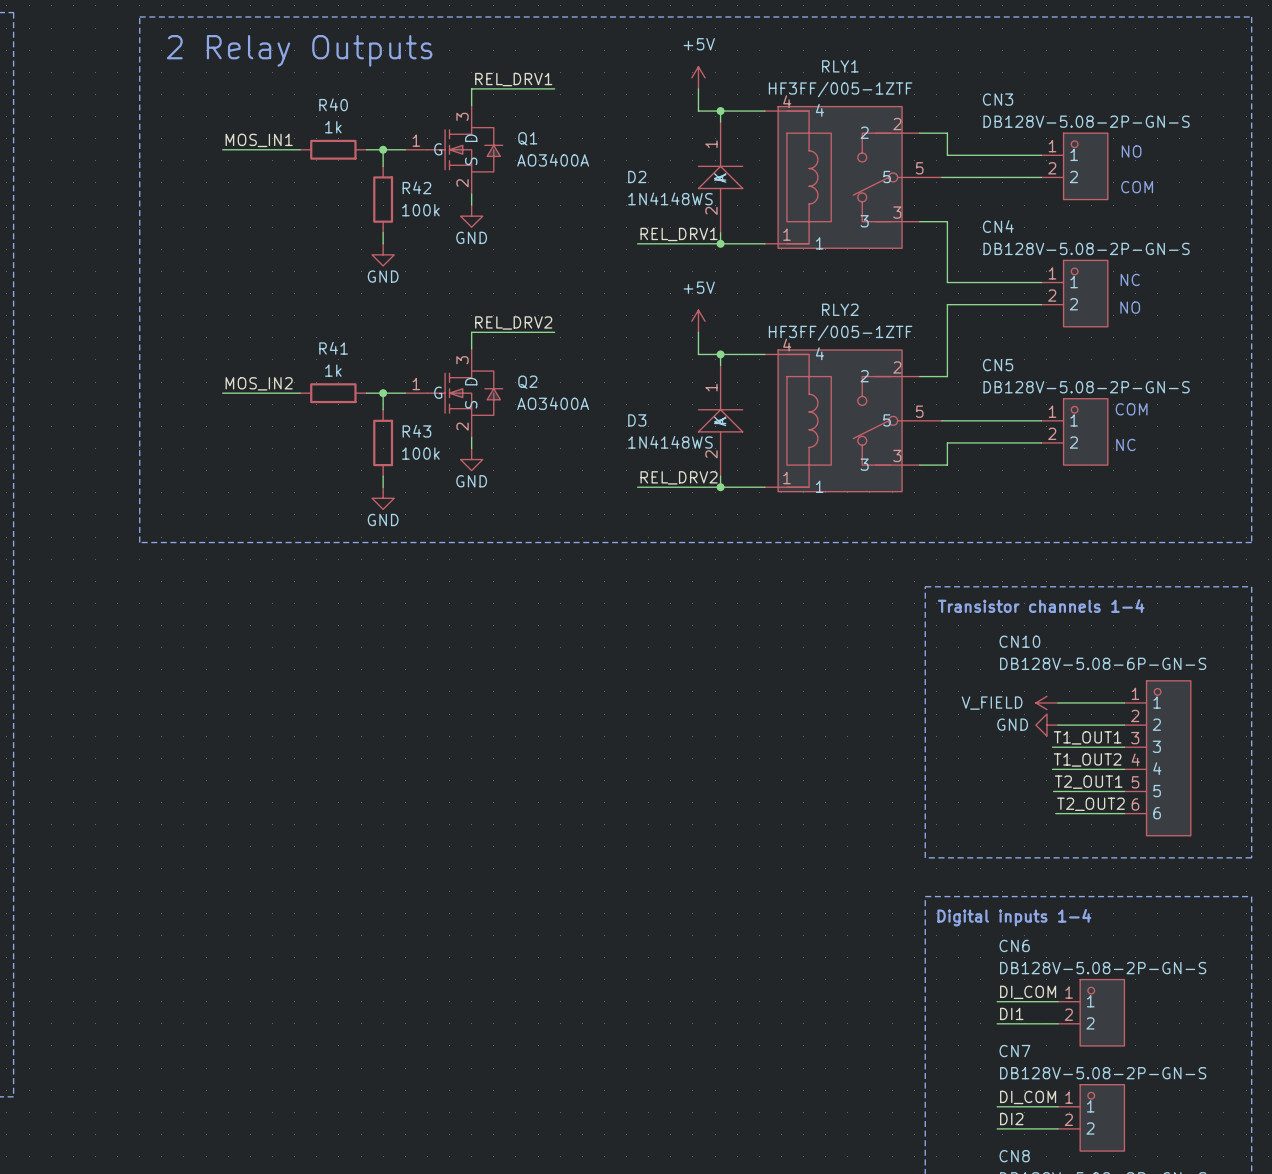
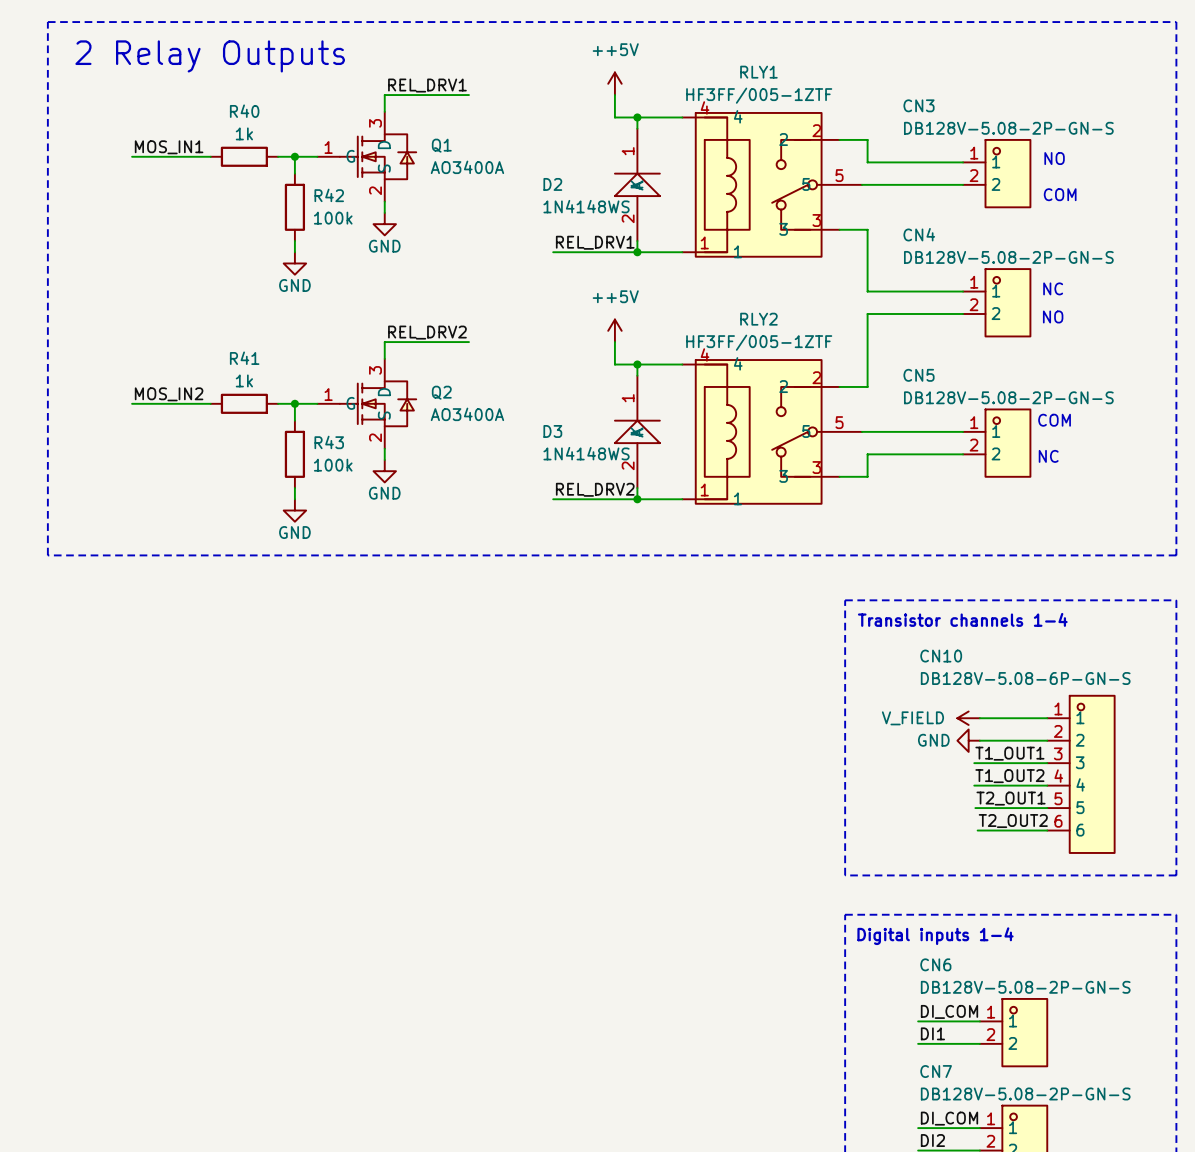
power symbol: +5V (698, 77) -> ++5V (614, 83)
power symbol: +5V (698, 321) -> ++5V (614, 330)

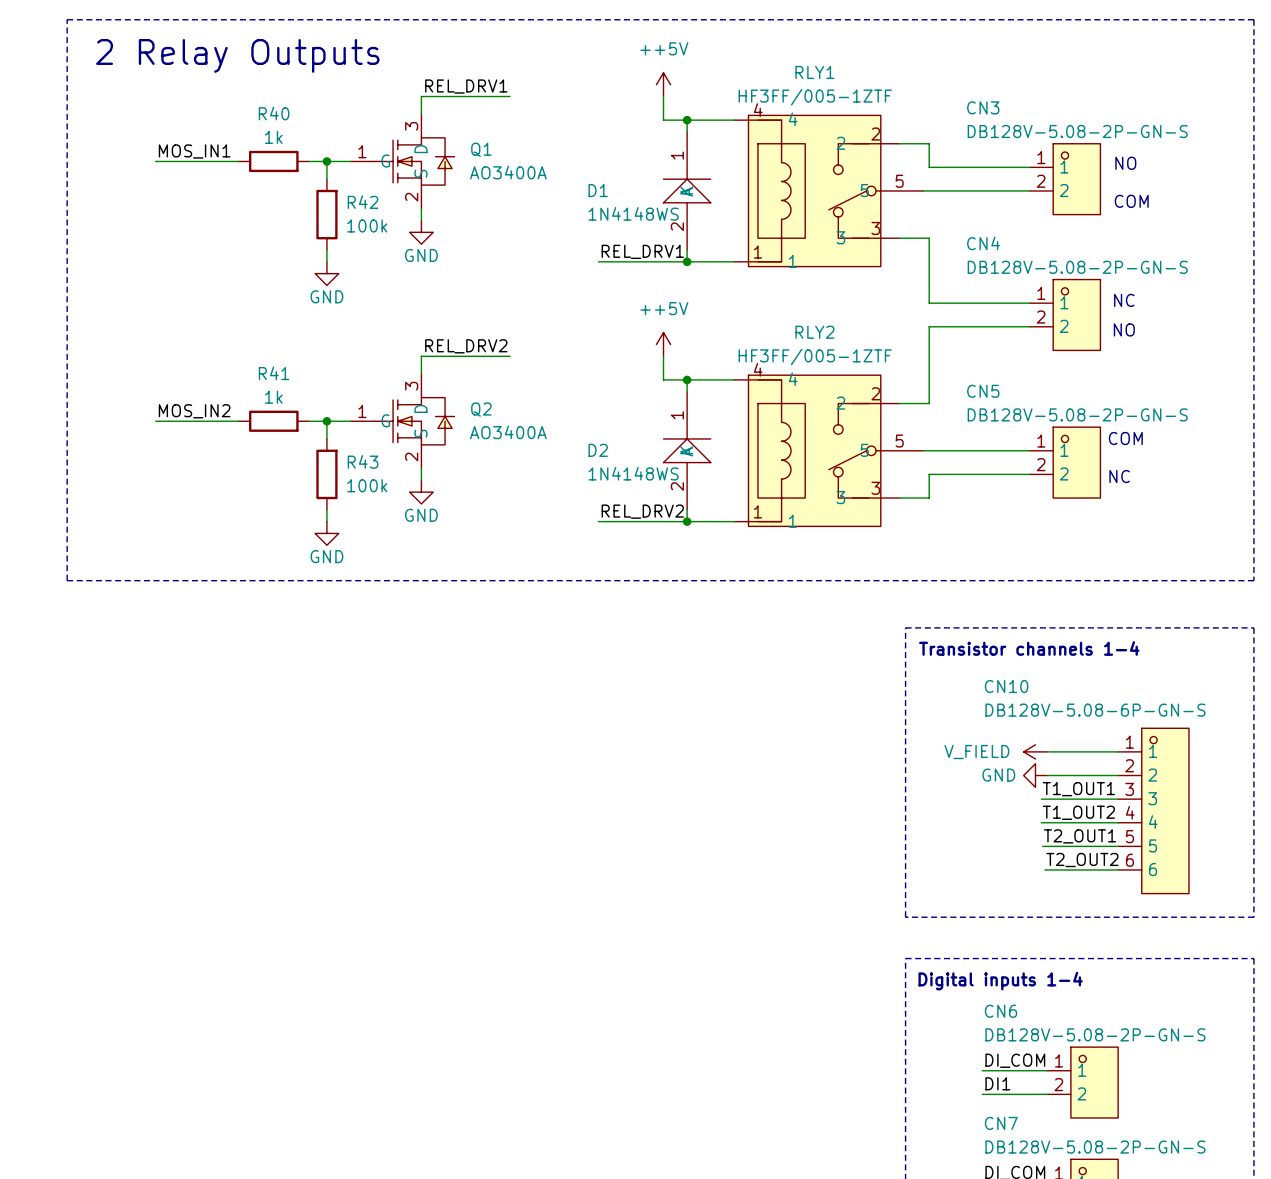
D2 name: D2 (552, 184) -> D1 (598, 190)
D3 name: D3 (552, 431) -> D2 (598, 450)

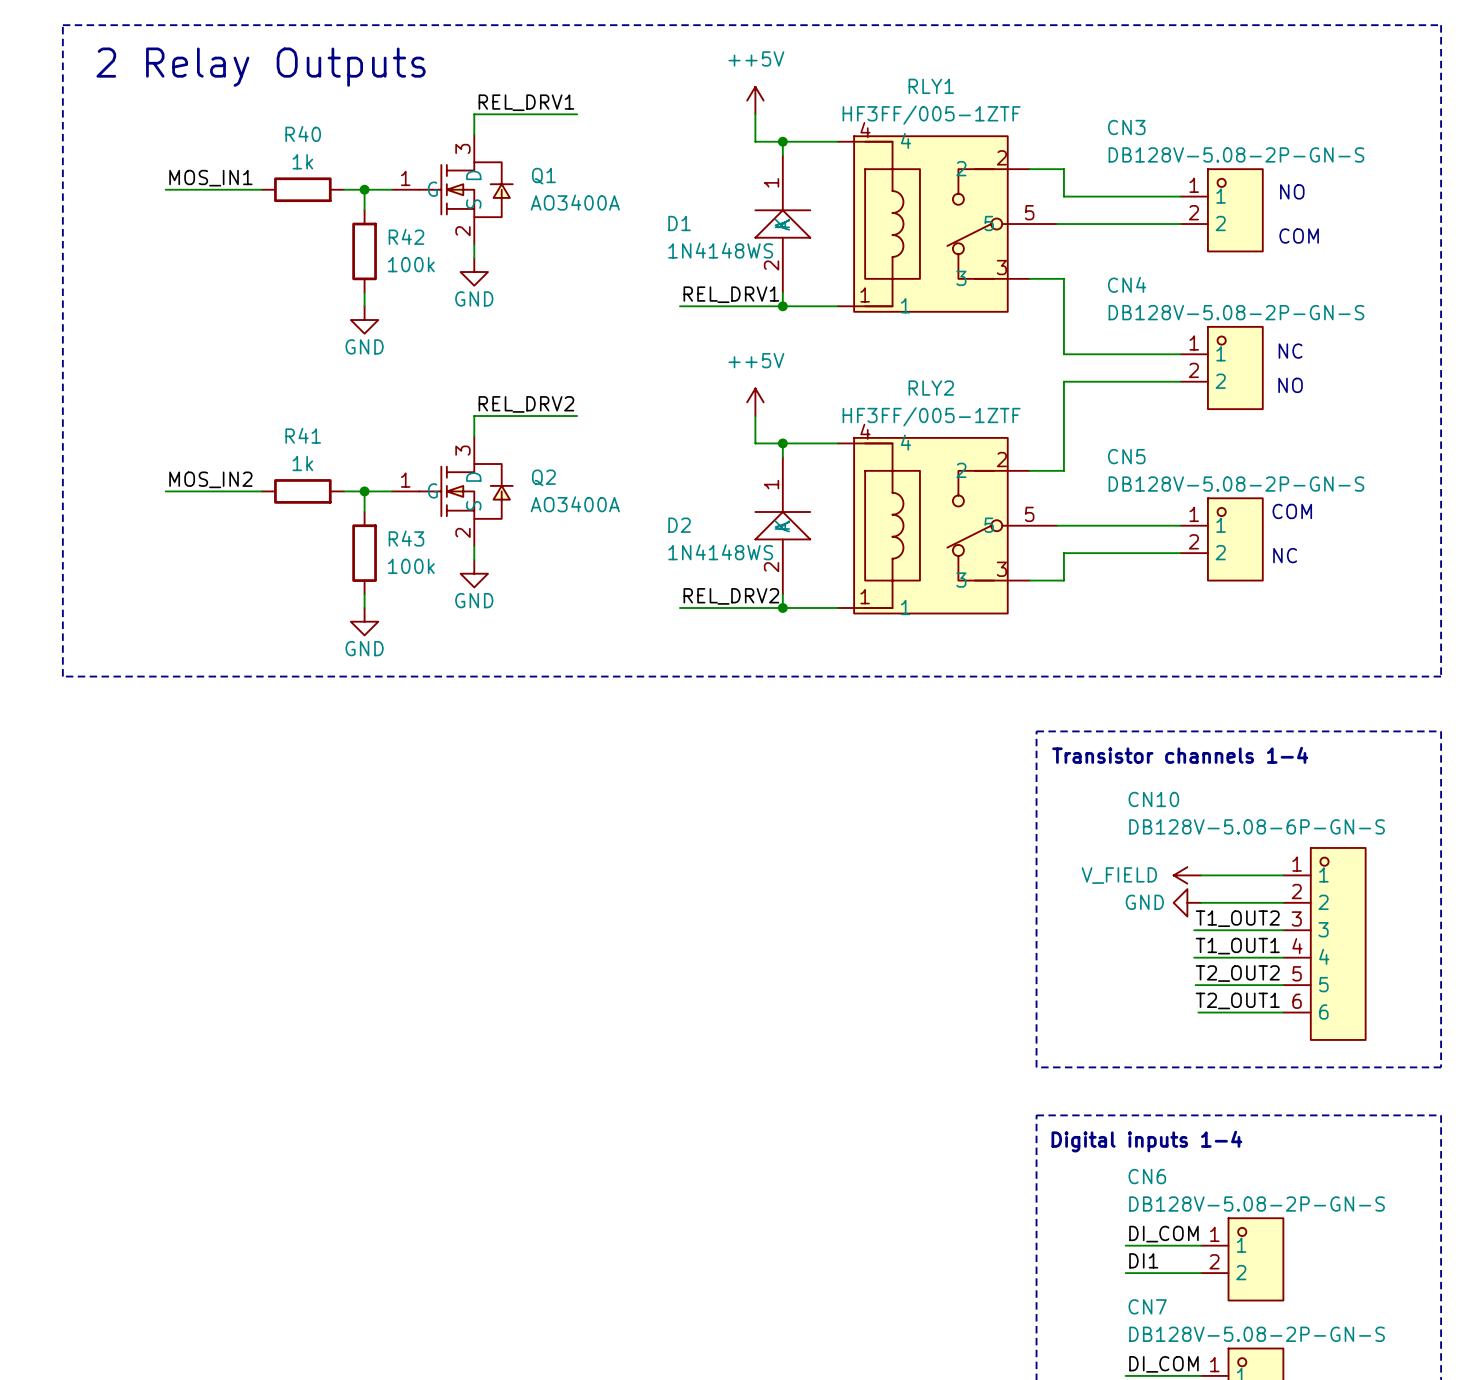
label: T1_OUT1 (1078, 789) -> T1_OUT2 (1237, 918)
label: T1_OUT2 (1078, 812) -> T1_OUT1 (1237, 946)
label: T2_OUT1 (1080, 836) -> T2_OUT2 (1237, 973)
label: T2_OUT2 (1082, 860) -> T2_OUT1 (1237, 1000)

